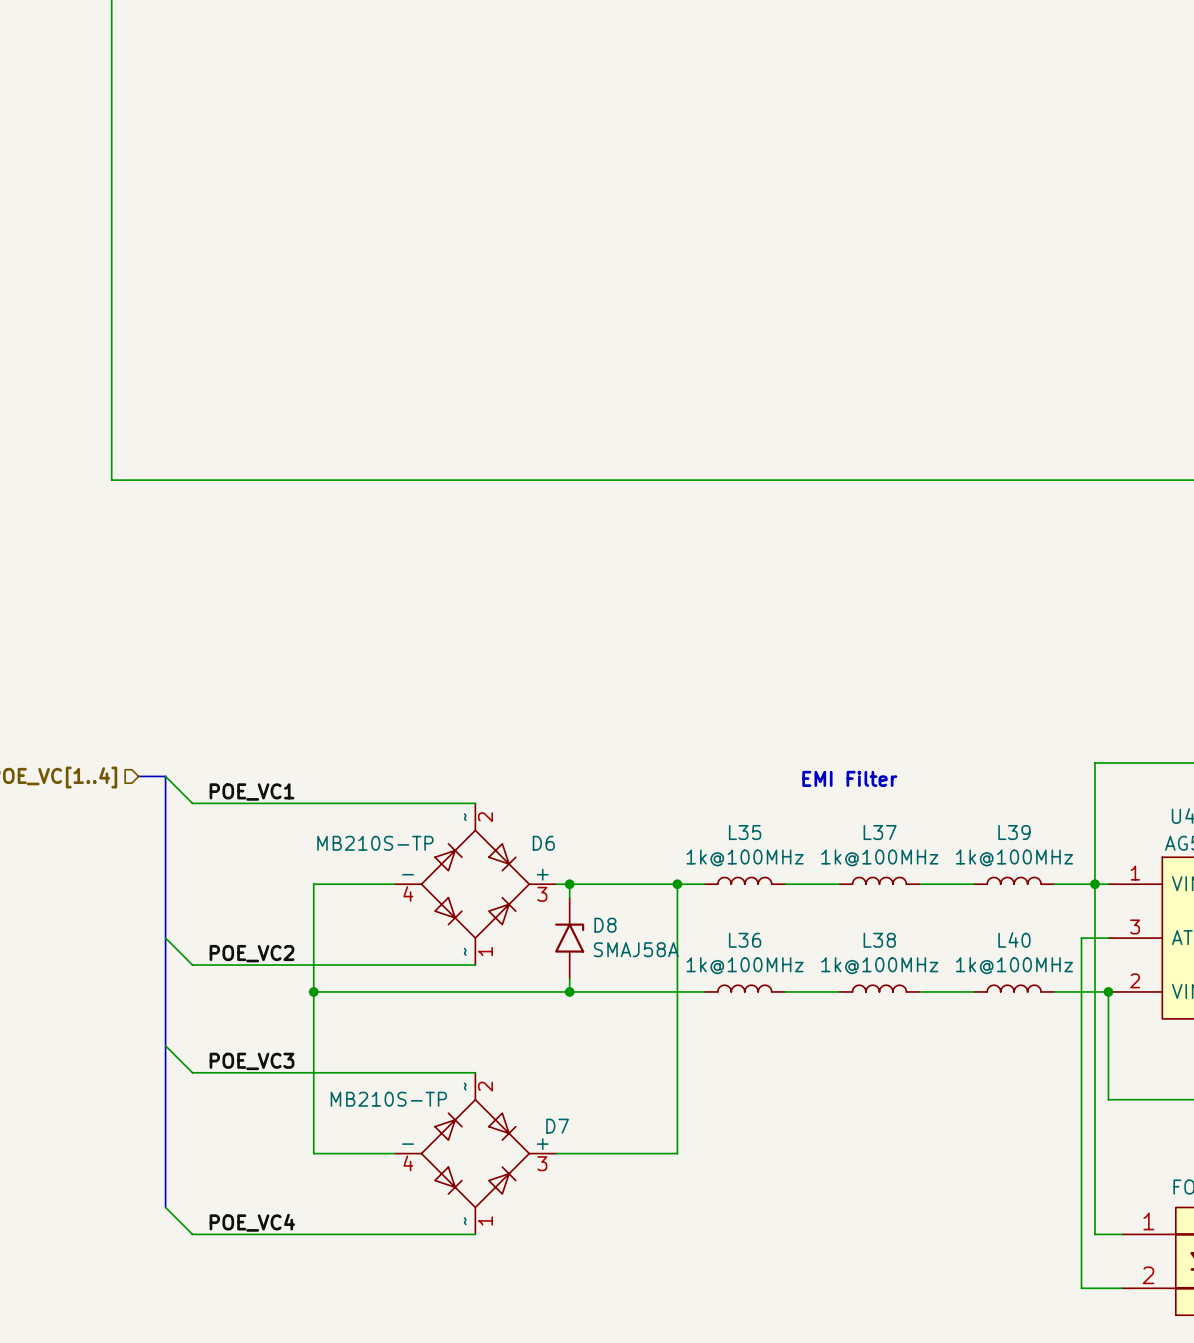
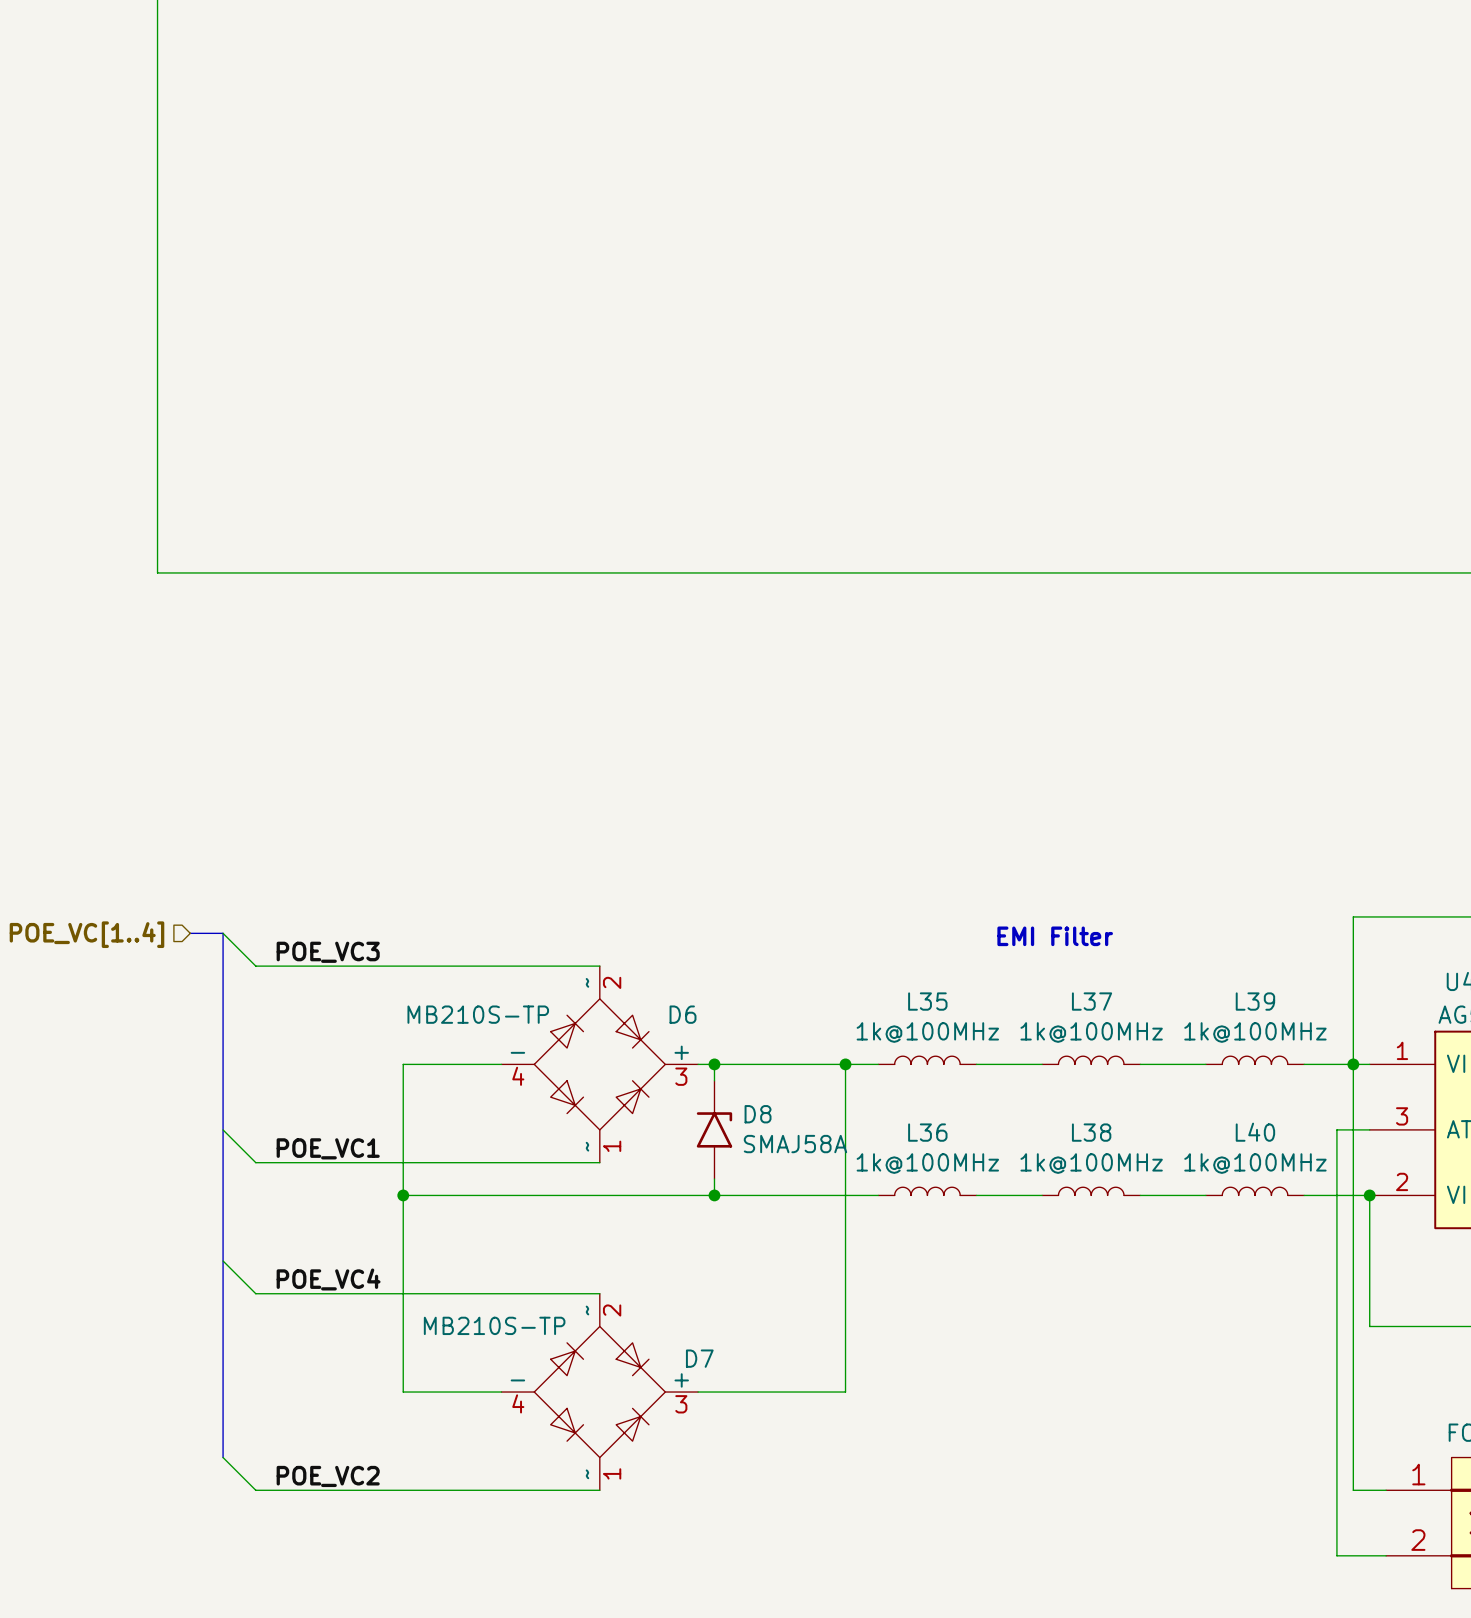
label: POE_VC1 (252, 792) -> POE_VC3 (328, 952)
label: POE_VC2 (252, 953) -> POE_VC1 (328, 1148)
label: POE_VC3 (252, 1061) -> POE_VC4 (328, 1279)
label: POE_VC4 (252, 1222) -> POE_VC2 (328, 1476)

